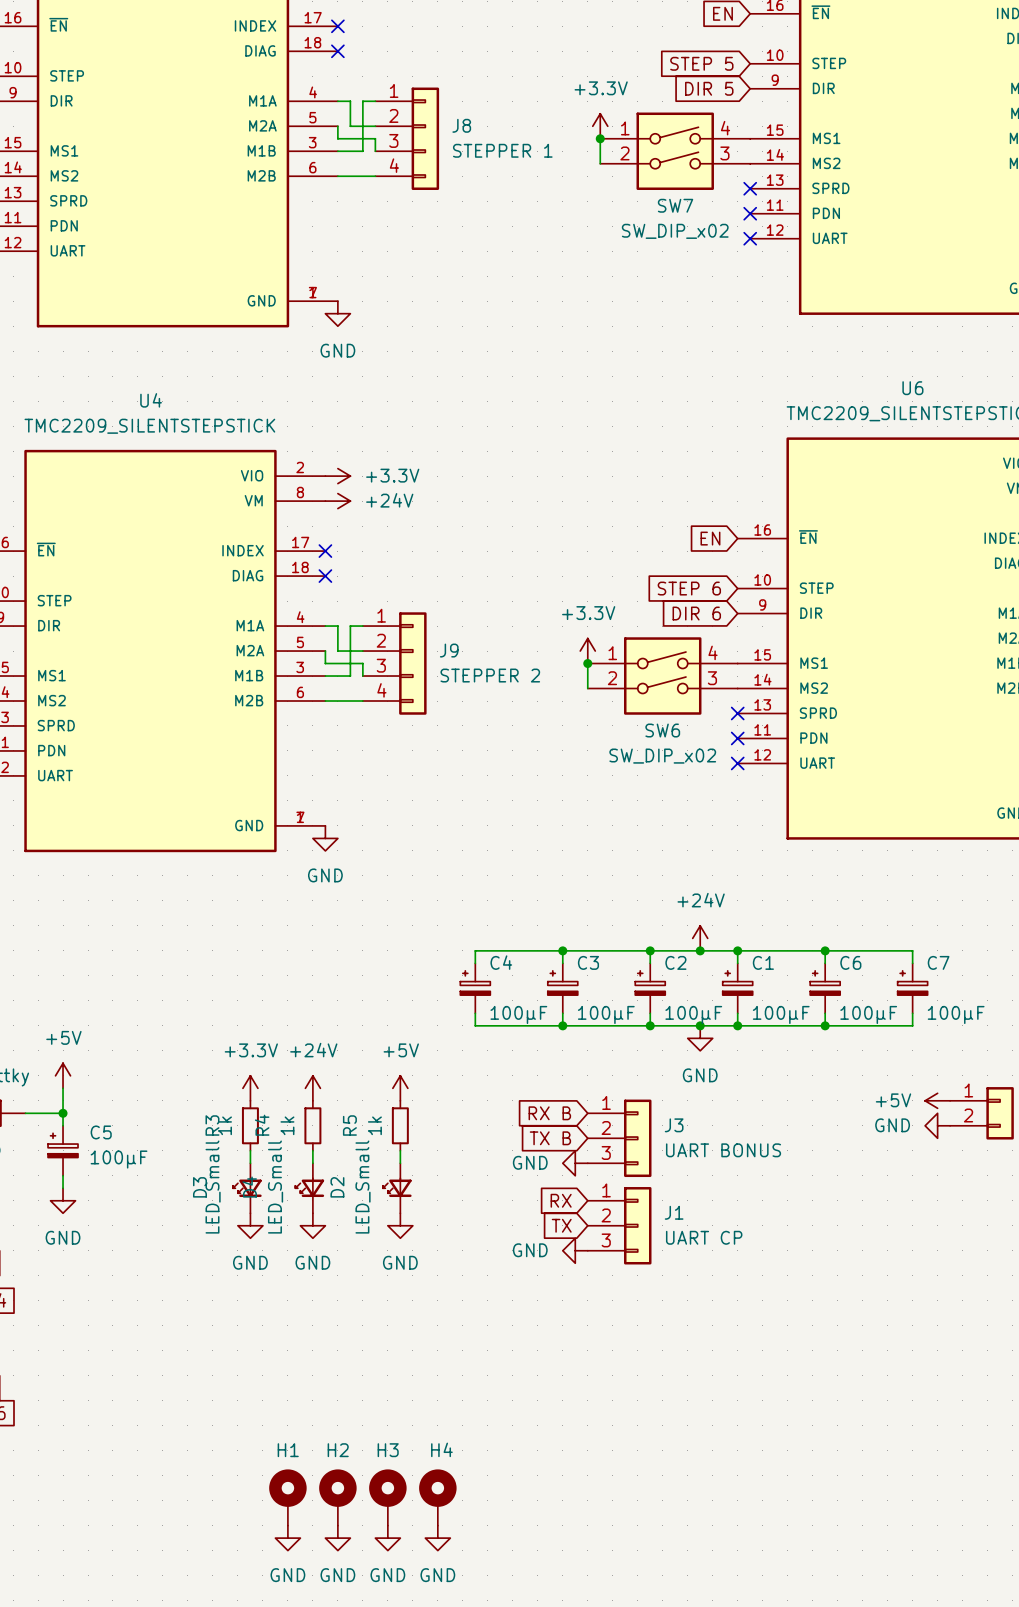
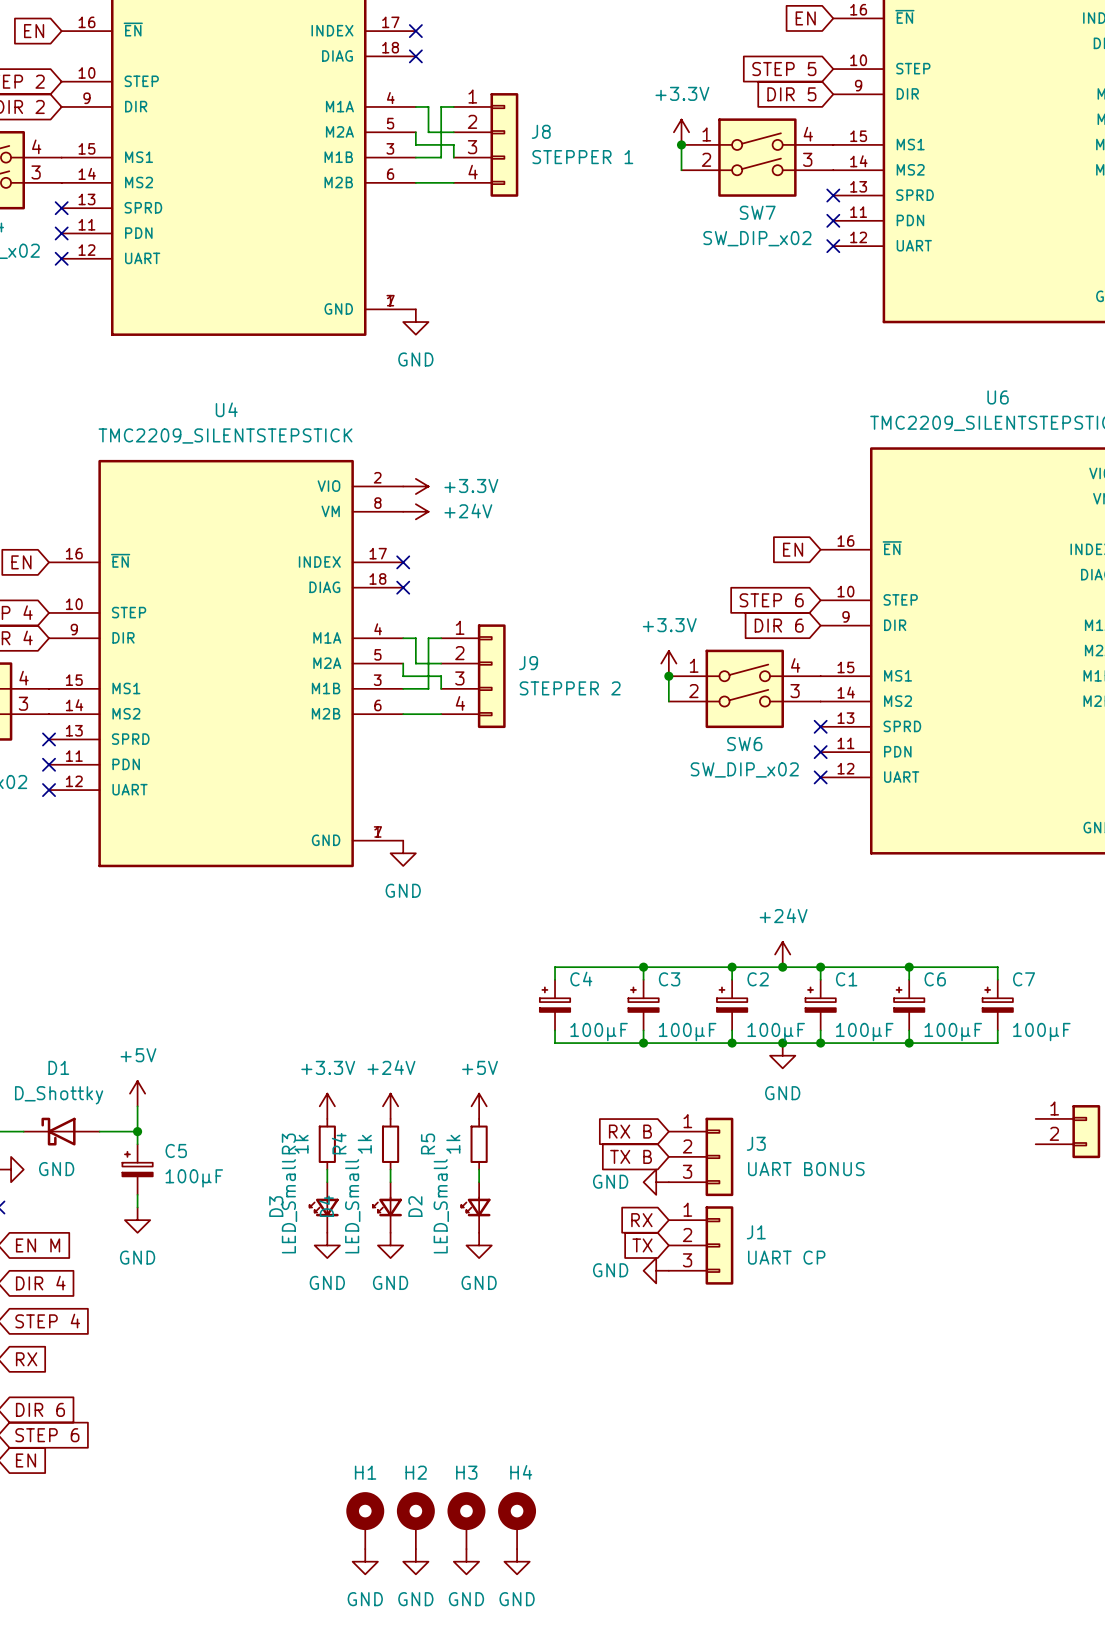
power symbol: +5V (937, 1100) -> none
power symbol: GND (937, 1125) -> none

